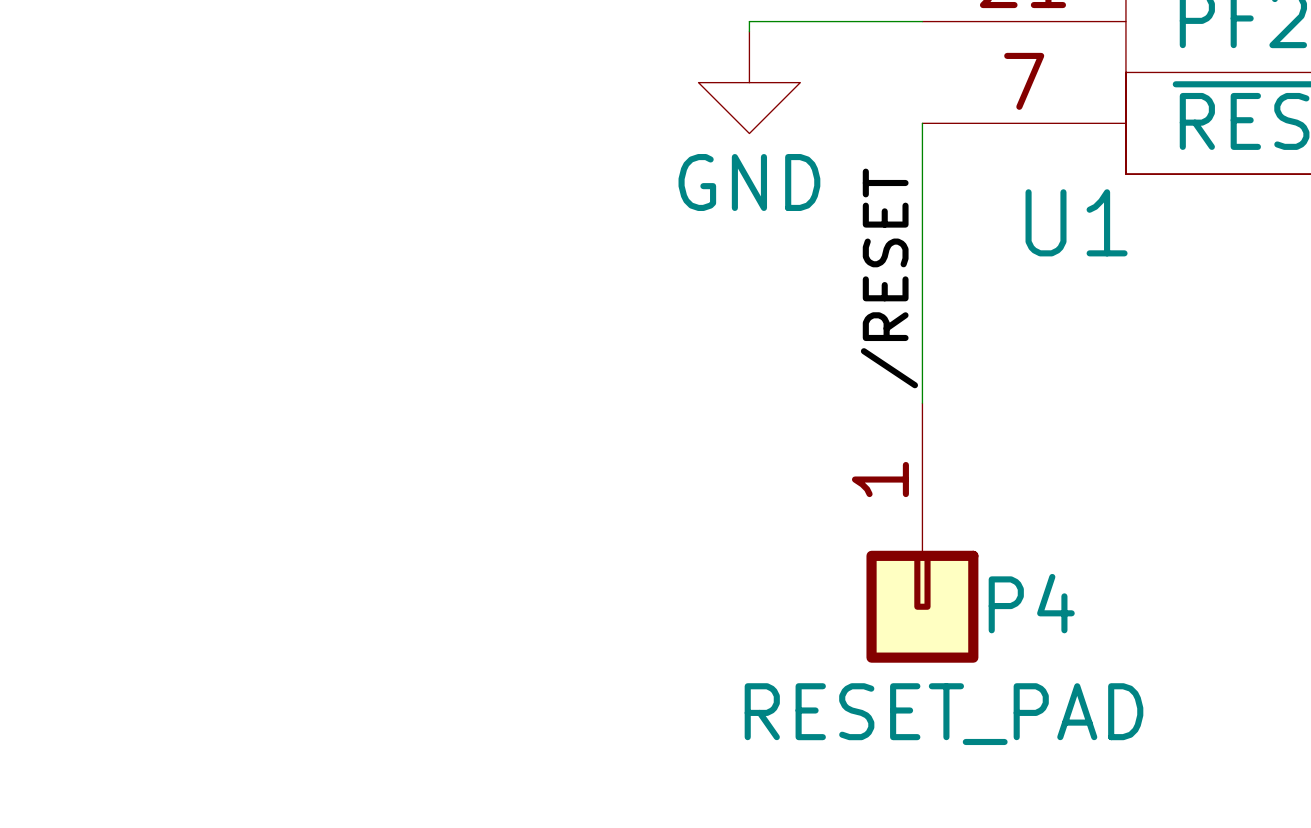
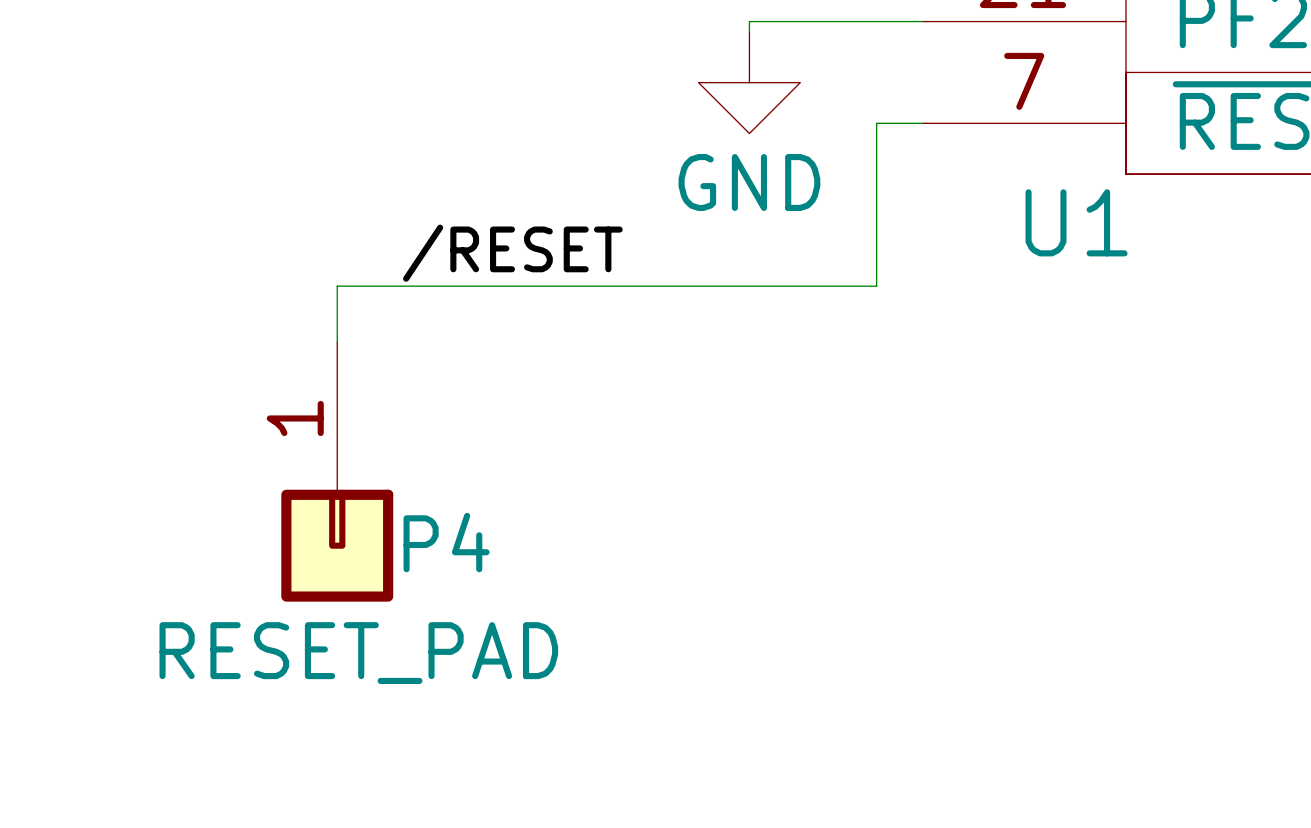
wire: (922, 123) (922, 403) -> (922, 123) (876, 123) (876, 286) (337, 286) (337, 342)
label rotation: 0° (889, 278) -> 90° clockwise (512, 253)
label position: /RESET (889, 278) -> /RESET (512, 253)
P4 position: (922, 532) -> (337, 471)

